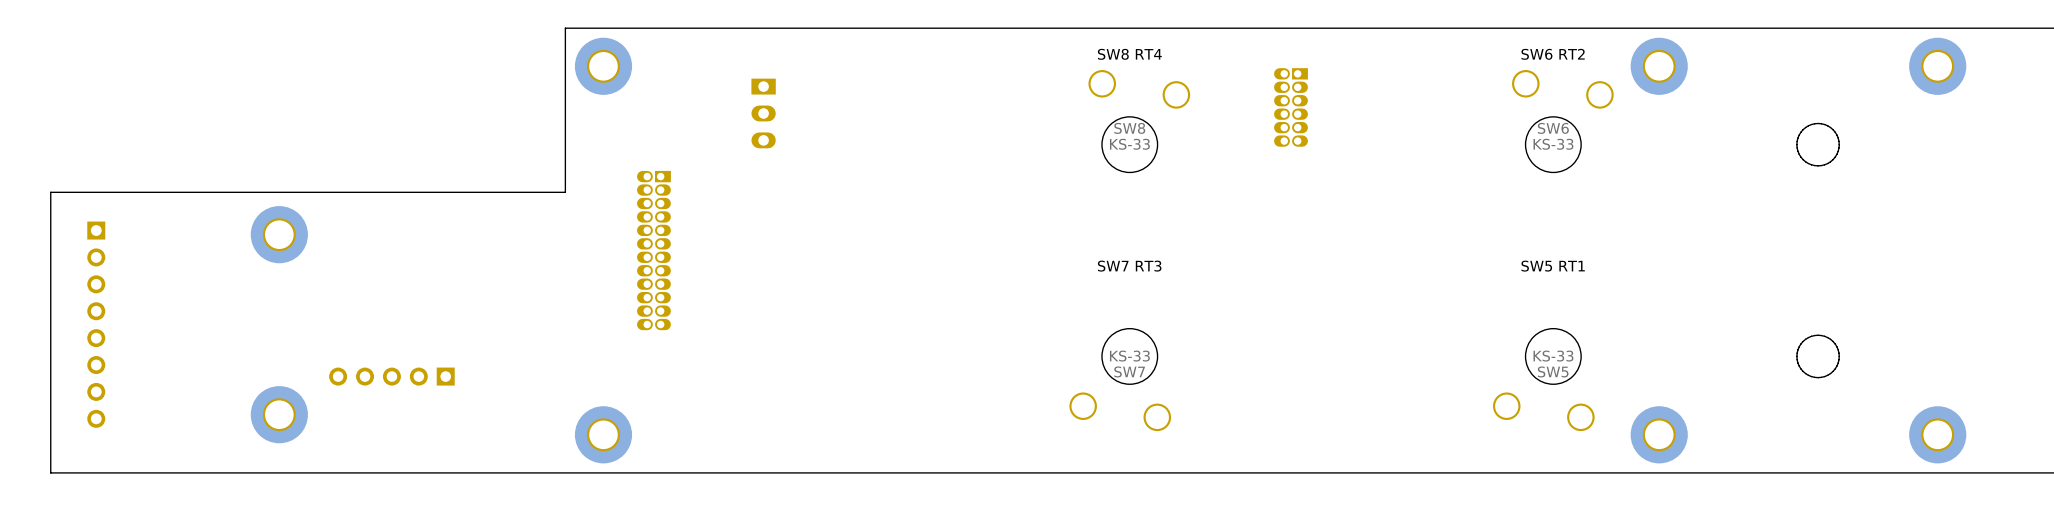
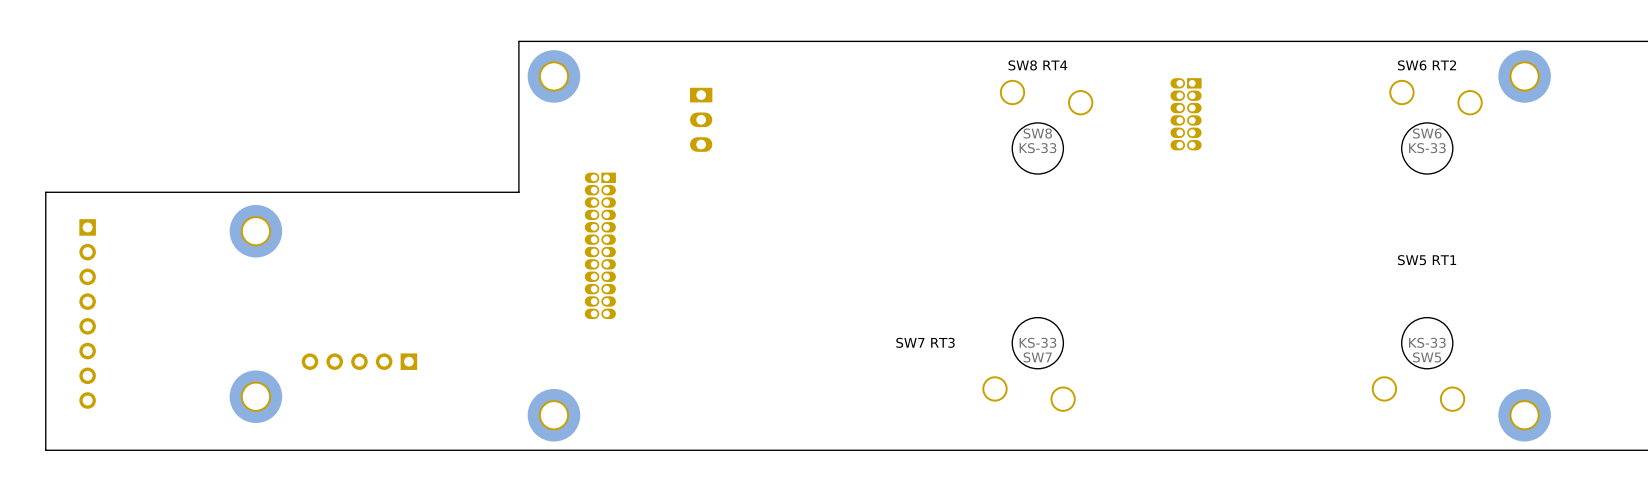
text position: SW7 RT3 (1129, 266) -> SW7 RT3 (925, 342)

